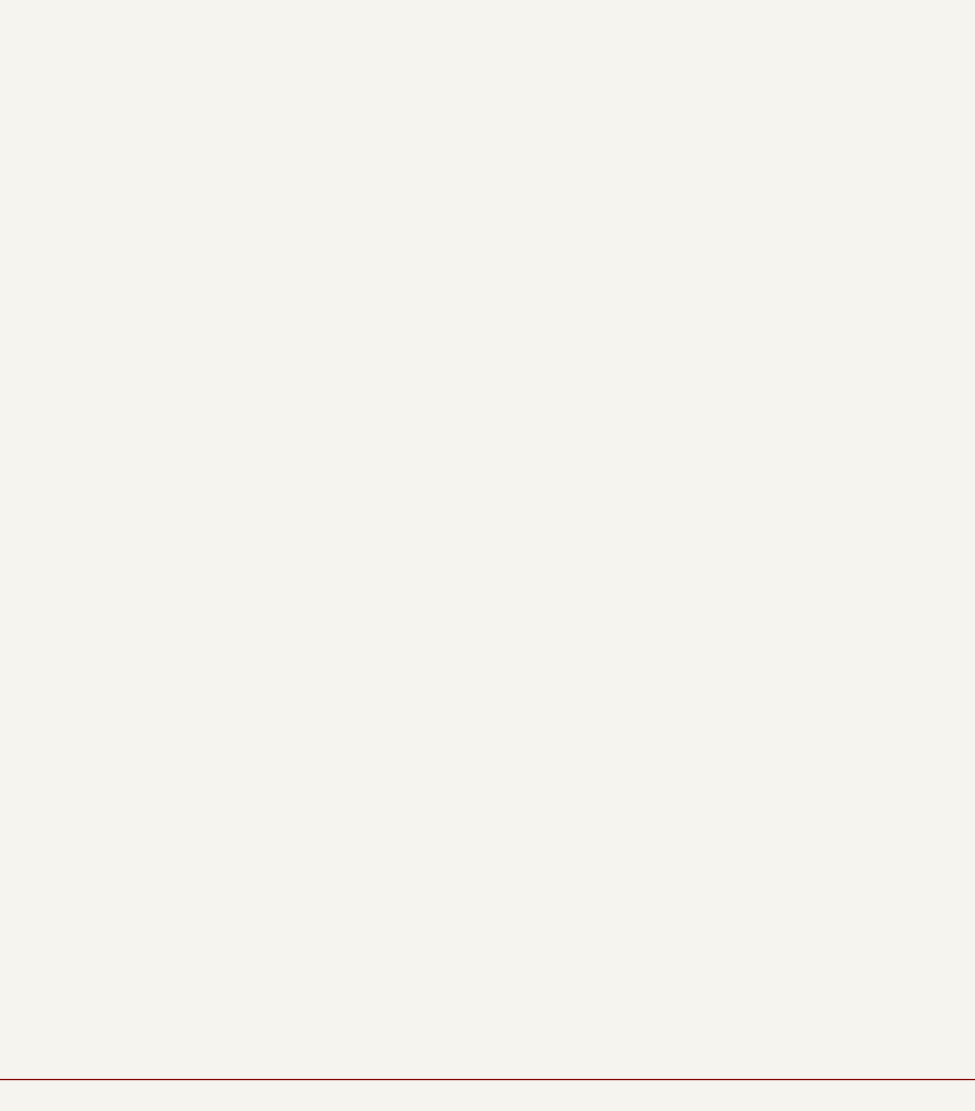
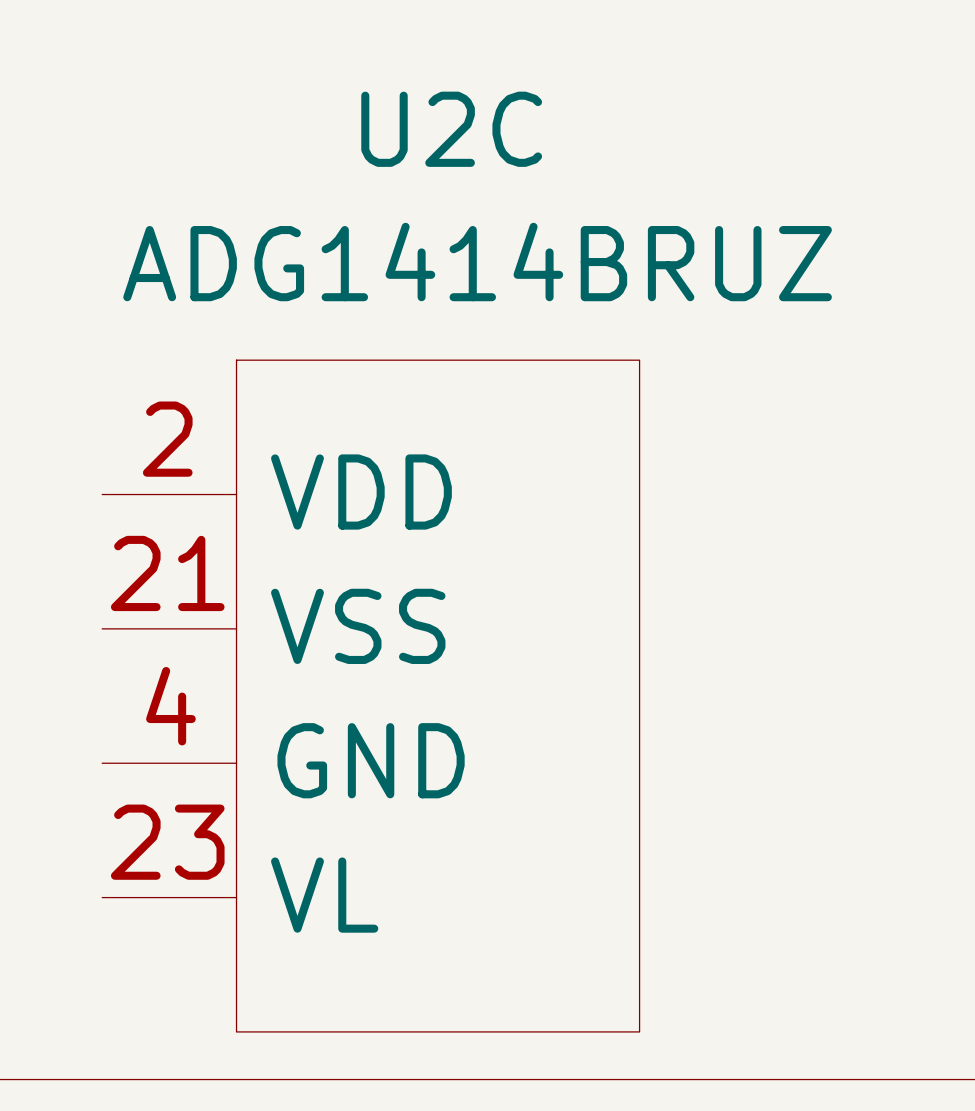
U2C: none -> ADG1414BRUZ (370, 696)

